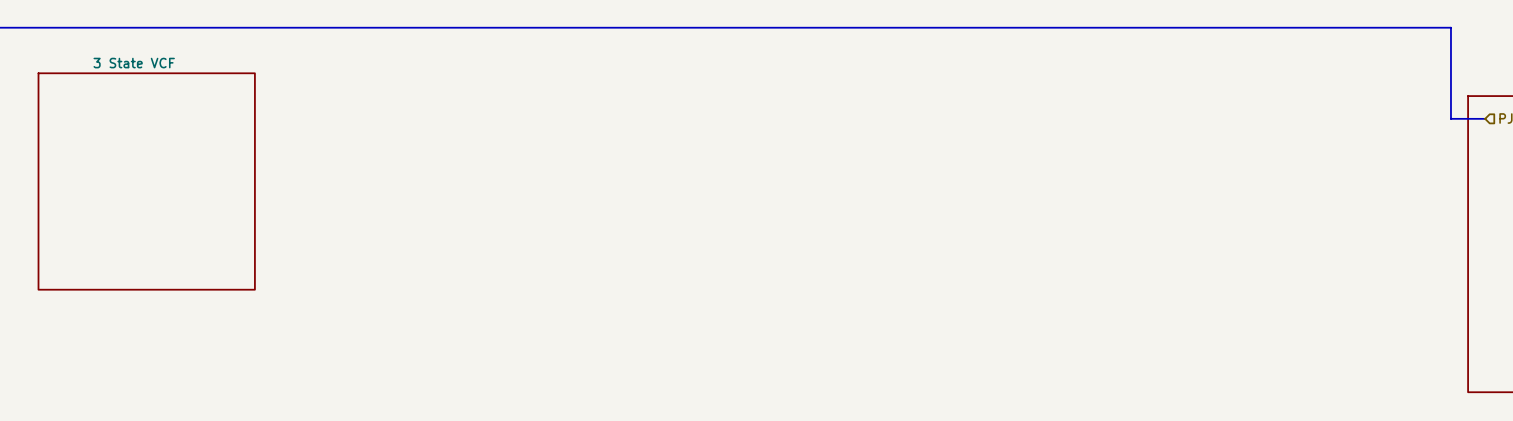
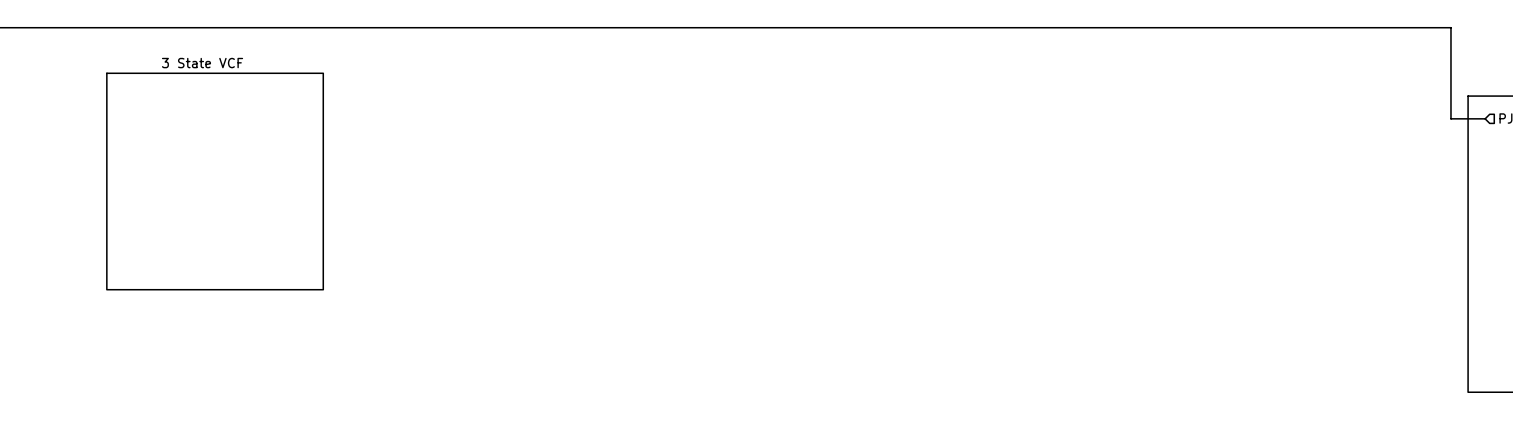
sheet 3 State VCF position: (146, 181) -> (215, 181)

